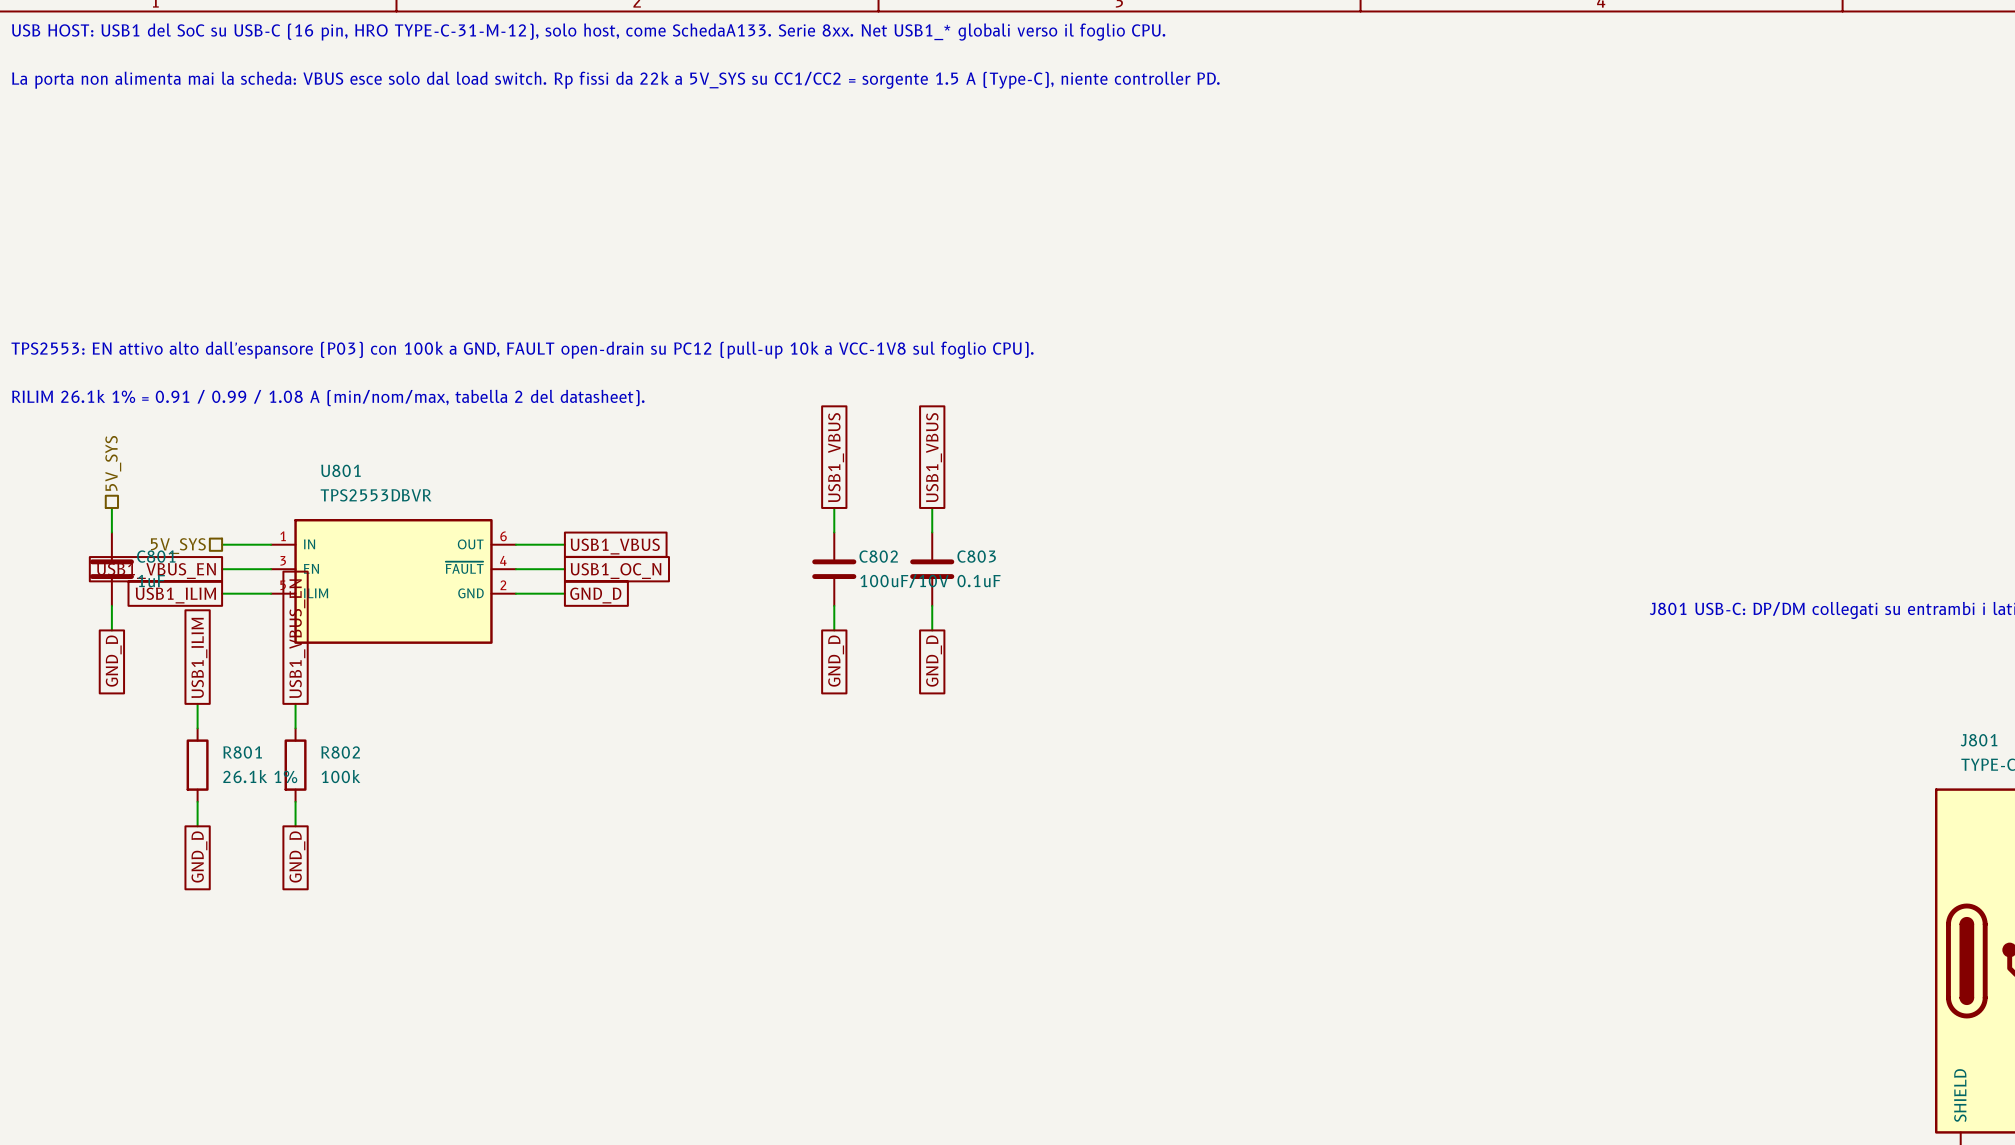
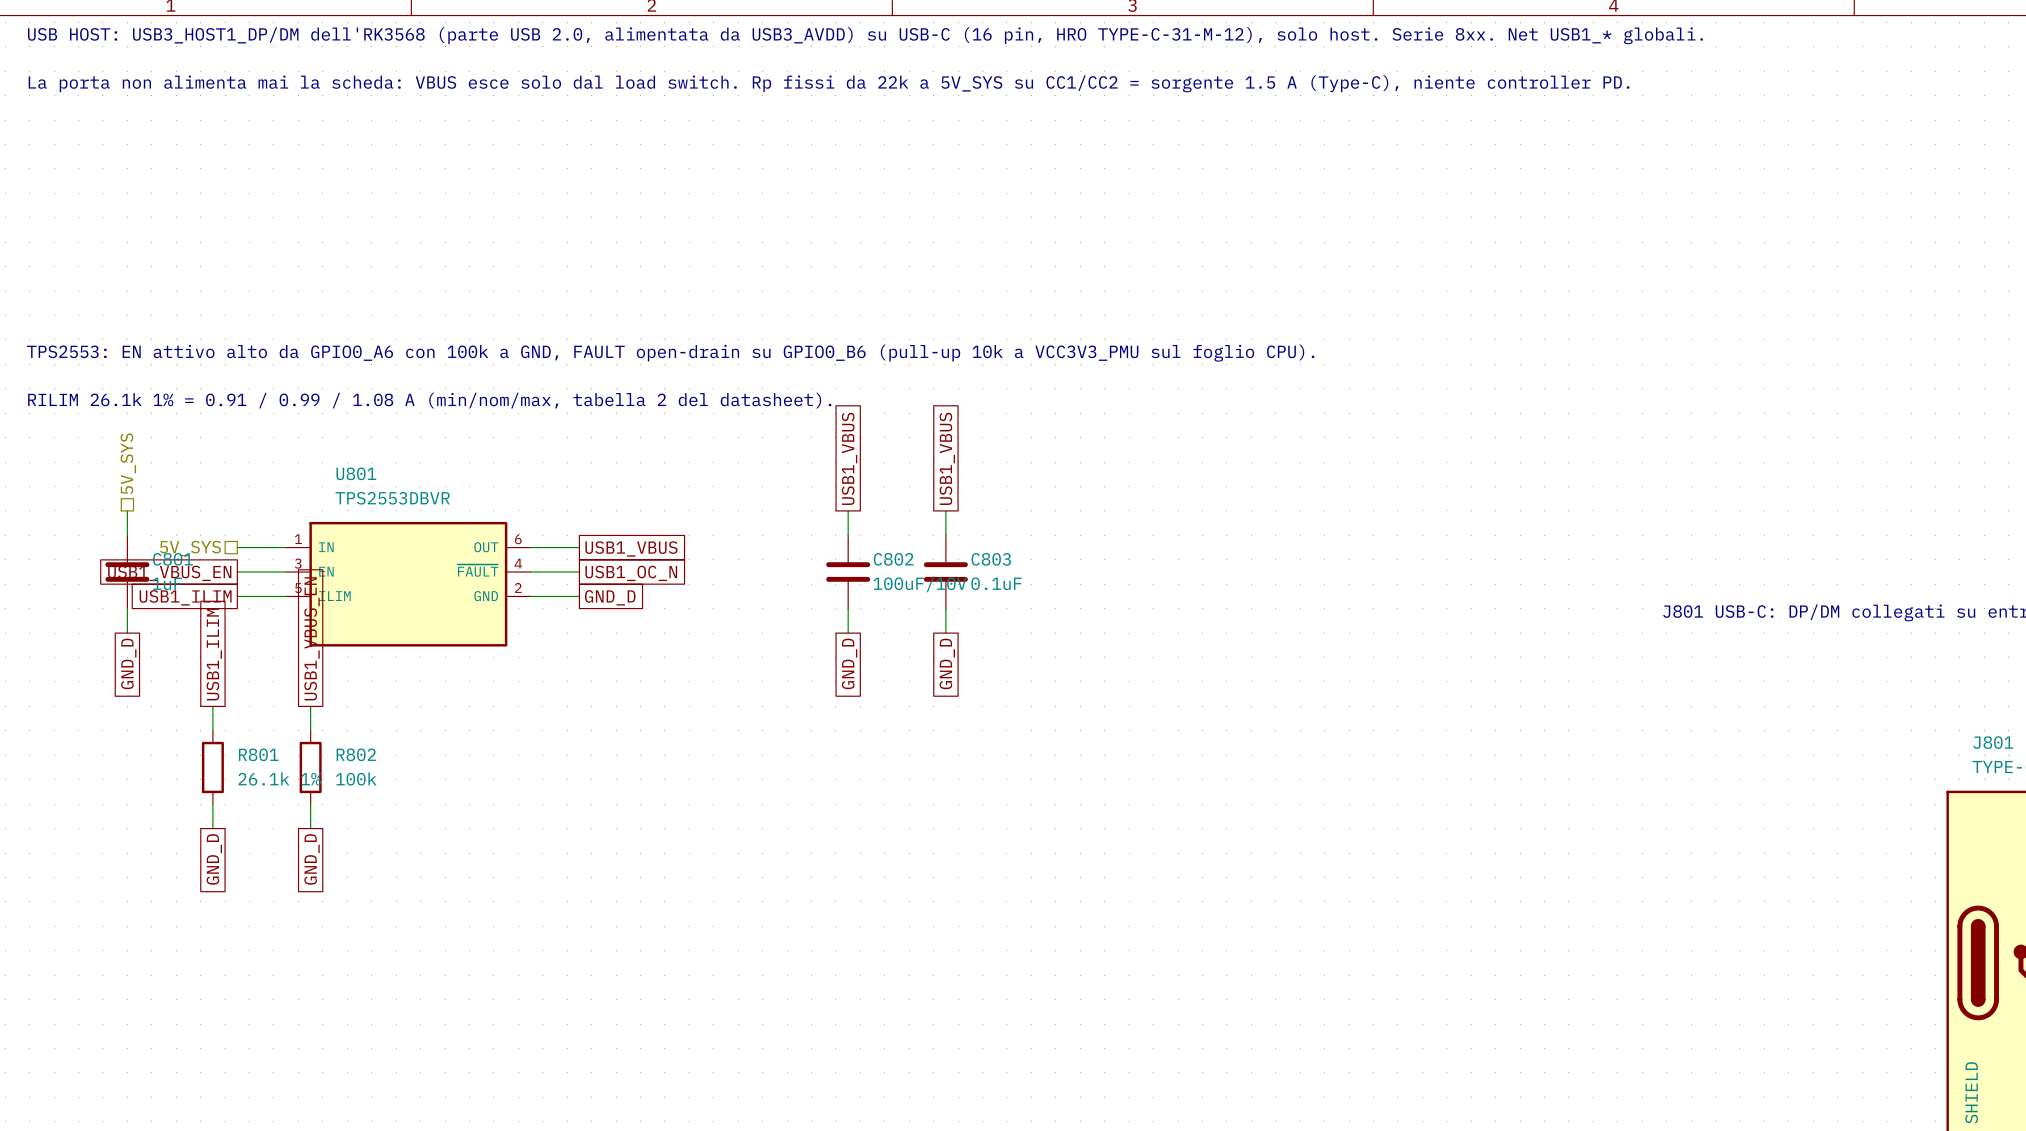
text: USB HOST: USB1 del SoC su USB-C (16 pin, HRO TYPE-C-31-M-12), solo host, come SchedaA133. Serie 8xx. Net USB1_* globali verso il foglio CPU. (588, 32) -> USB HOST: USB3_HOST1_DP/DM dell'RK3568 (parte USB 2.0, alimentata da USB3_AVDD) su USB-C (16 pin, HRO TYPE-C-31-M-12), solo host. Serie 8xx. Net USB1_* globali. (865, 35)
text: TPS2553: EN attivo alto dall'espansore (P03) con 100k a GND, FAULT open-drain su PC12 (pull-up 10k a VCC-1V8 sul foglio CPU). (522, 350) -> TPS2553: EN attivo alto da GPIO0_A6 con 100k a GND, FAULT open-drain su GPIO0_B6 (pull-up 10k a VCC3V3_PMU sul foglio CPU). (670, 353)

